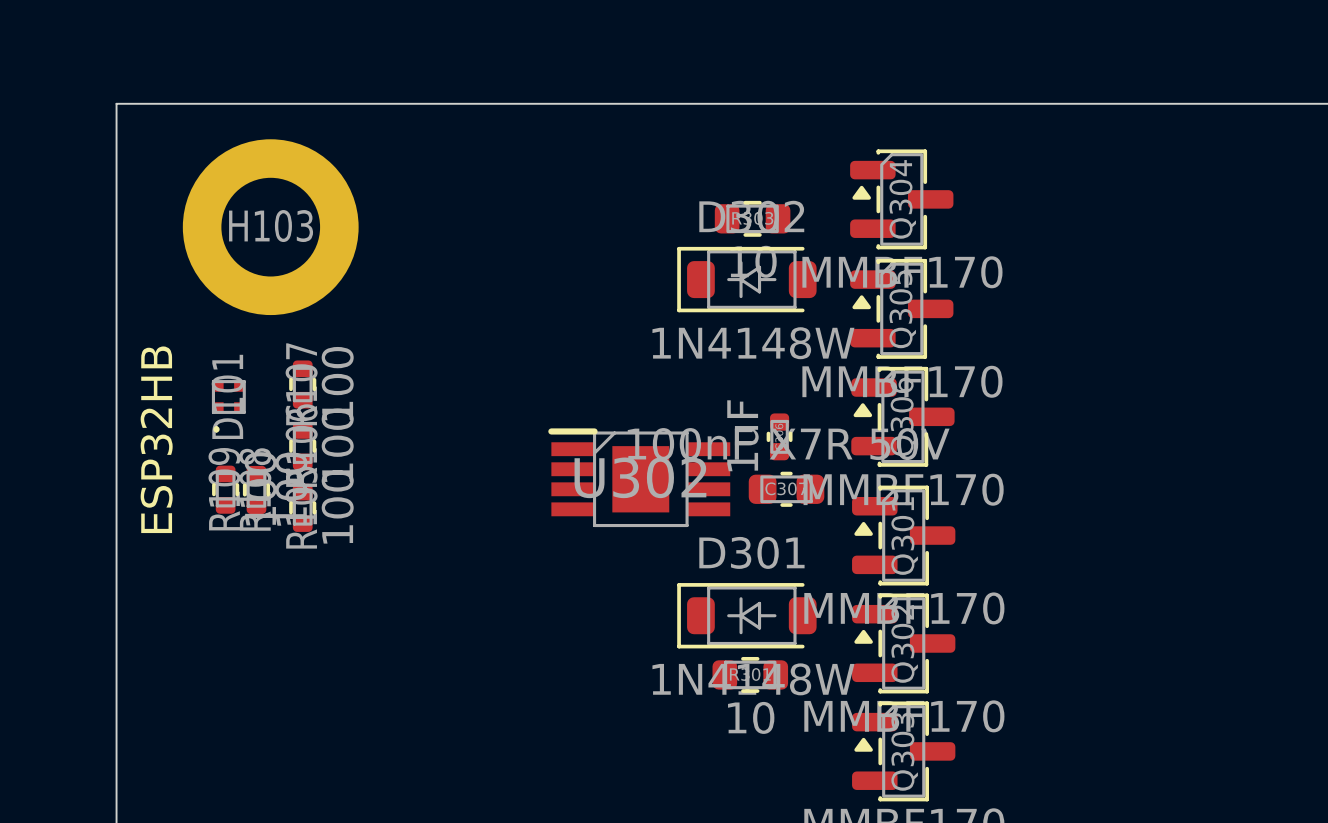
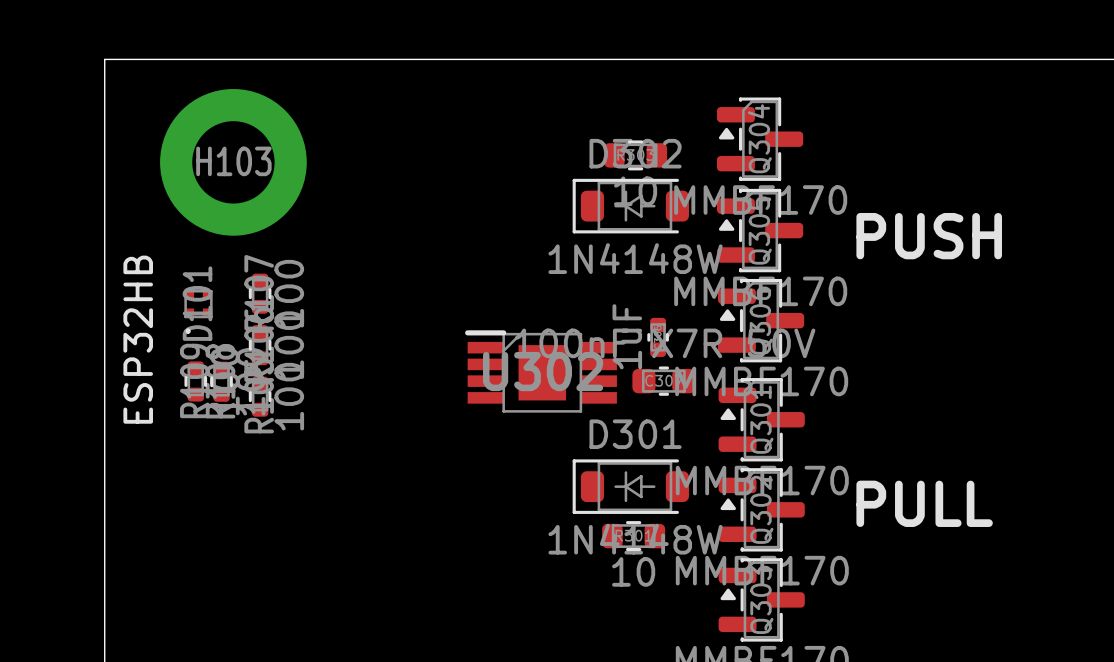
text: none -> PUSH (929, 236)
text: none -> PULL (924, 503)

